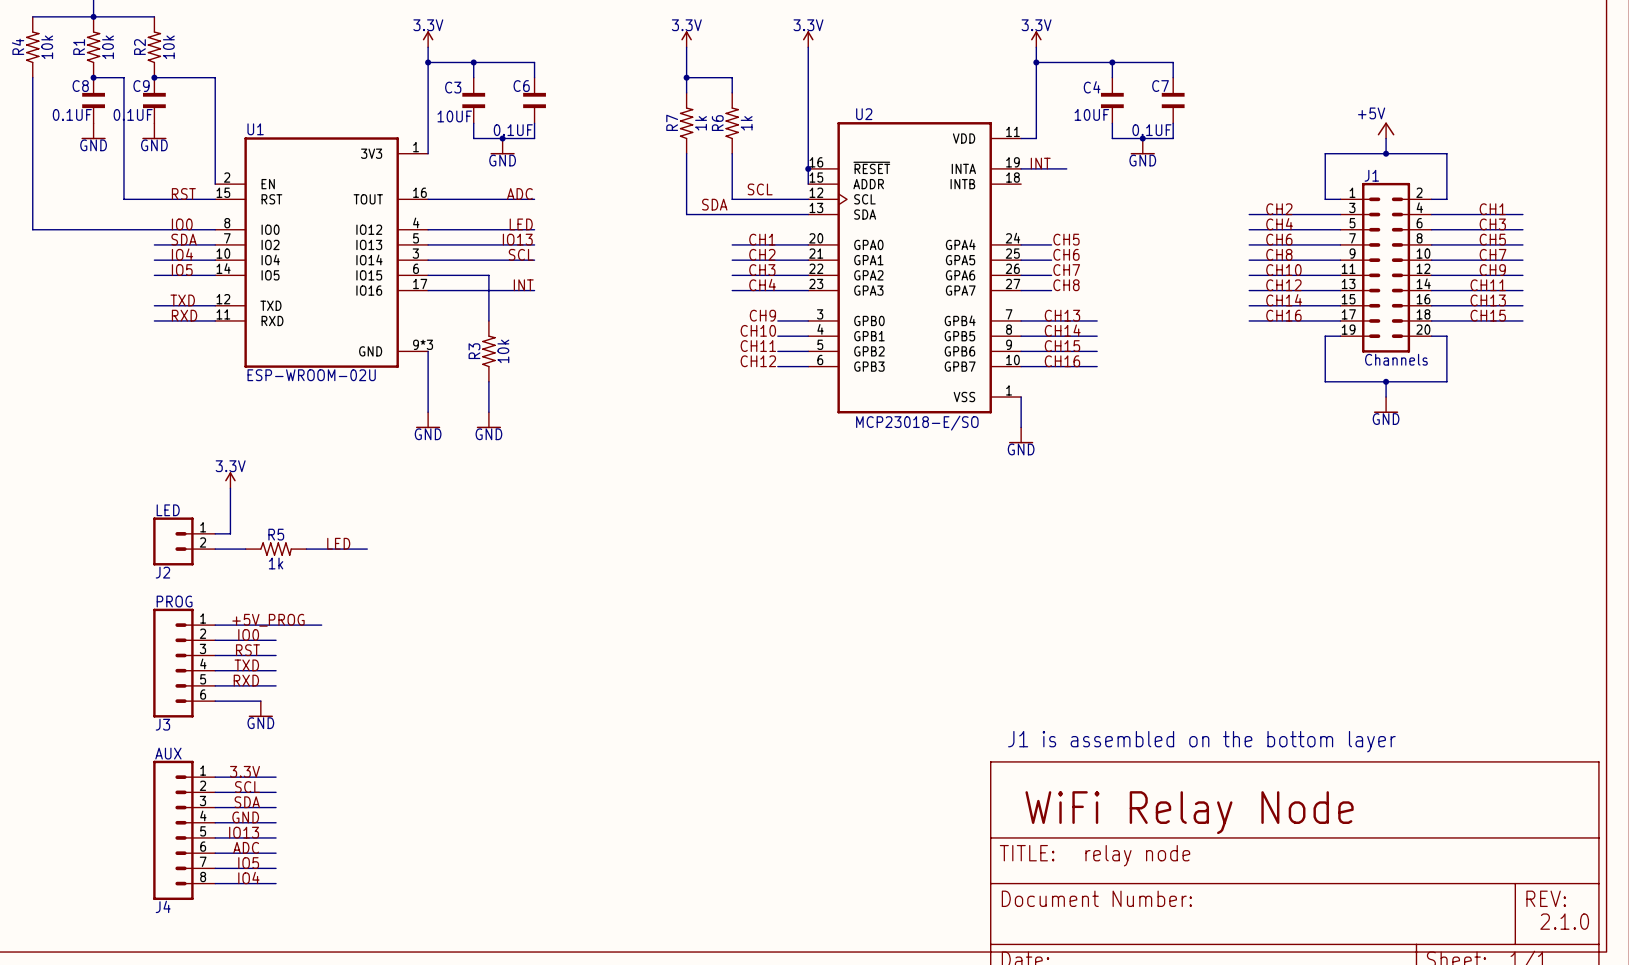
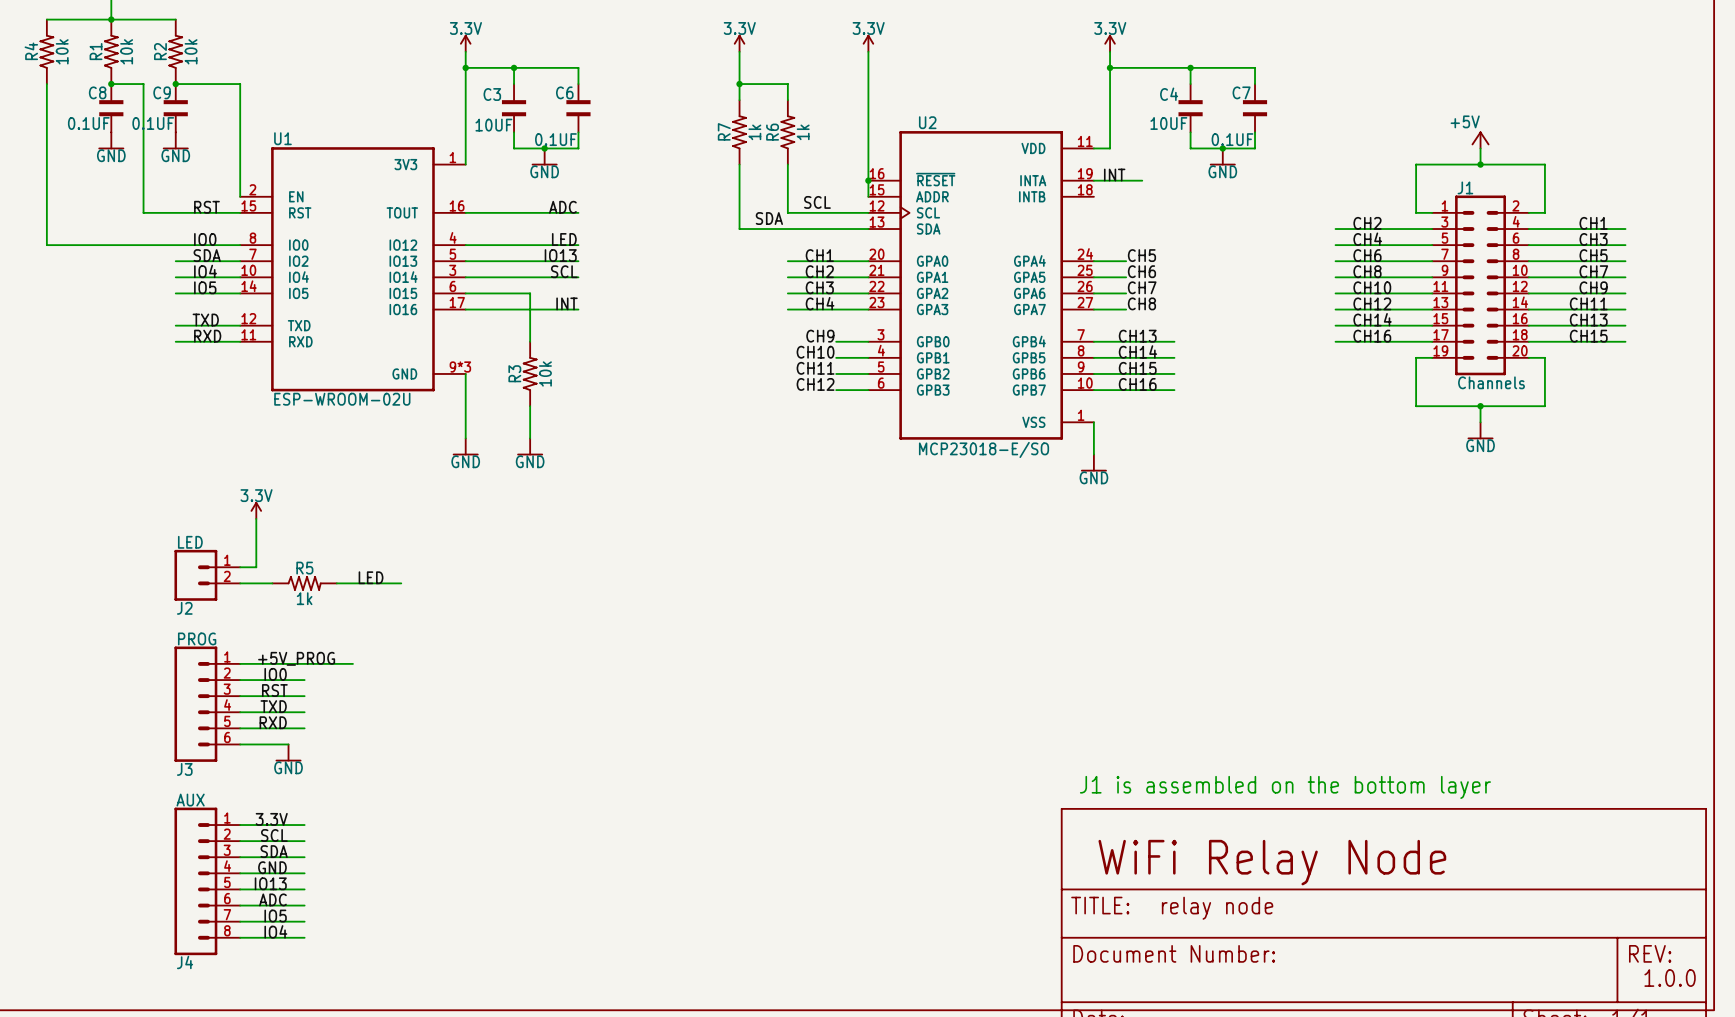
text: 2.1.0 (1564, 921) -> 1.0.0 (1670, 978)

